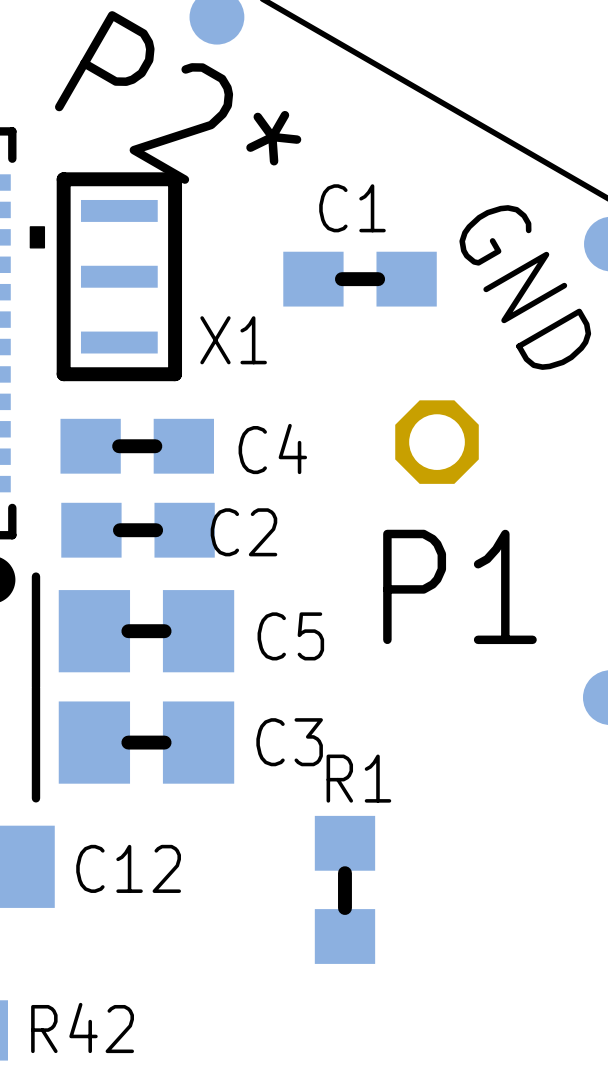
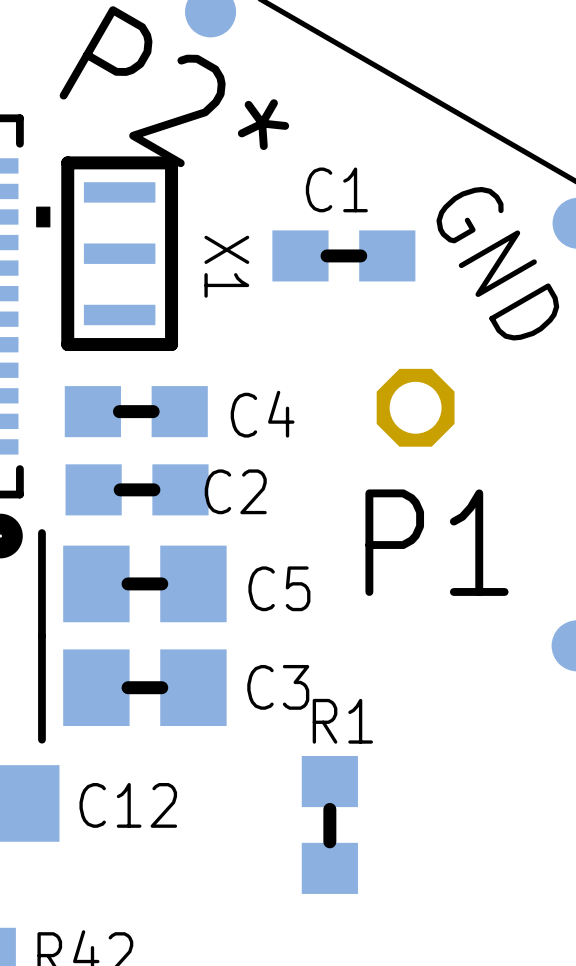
X1 name rotation: 0° (233, 340) -> 90° clockwise (226, 266)

